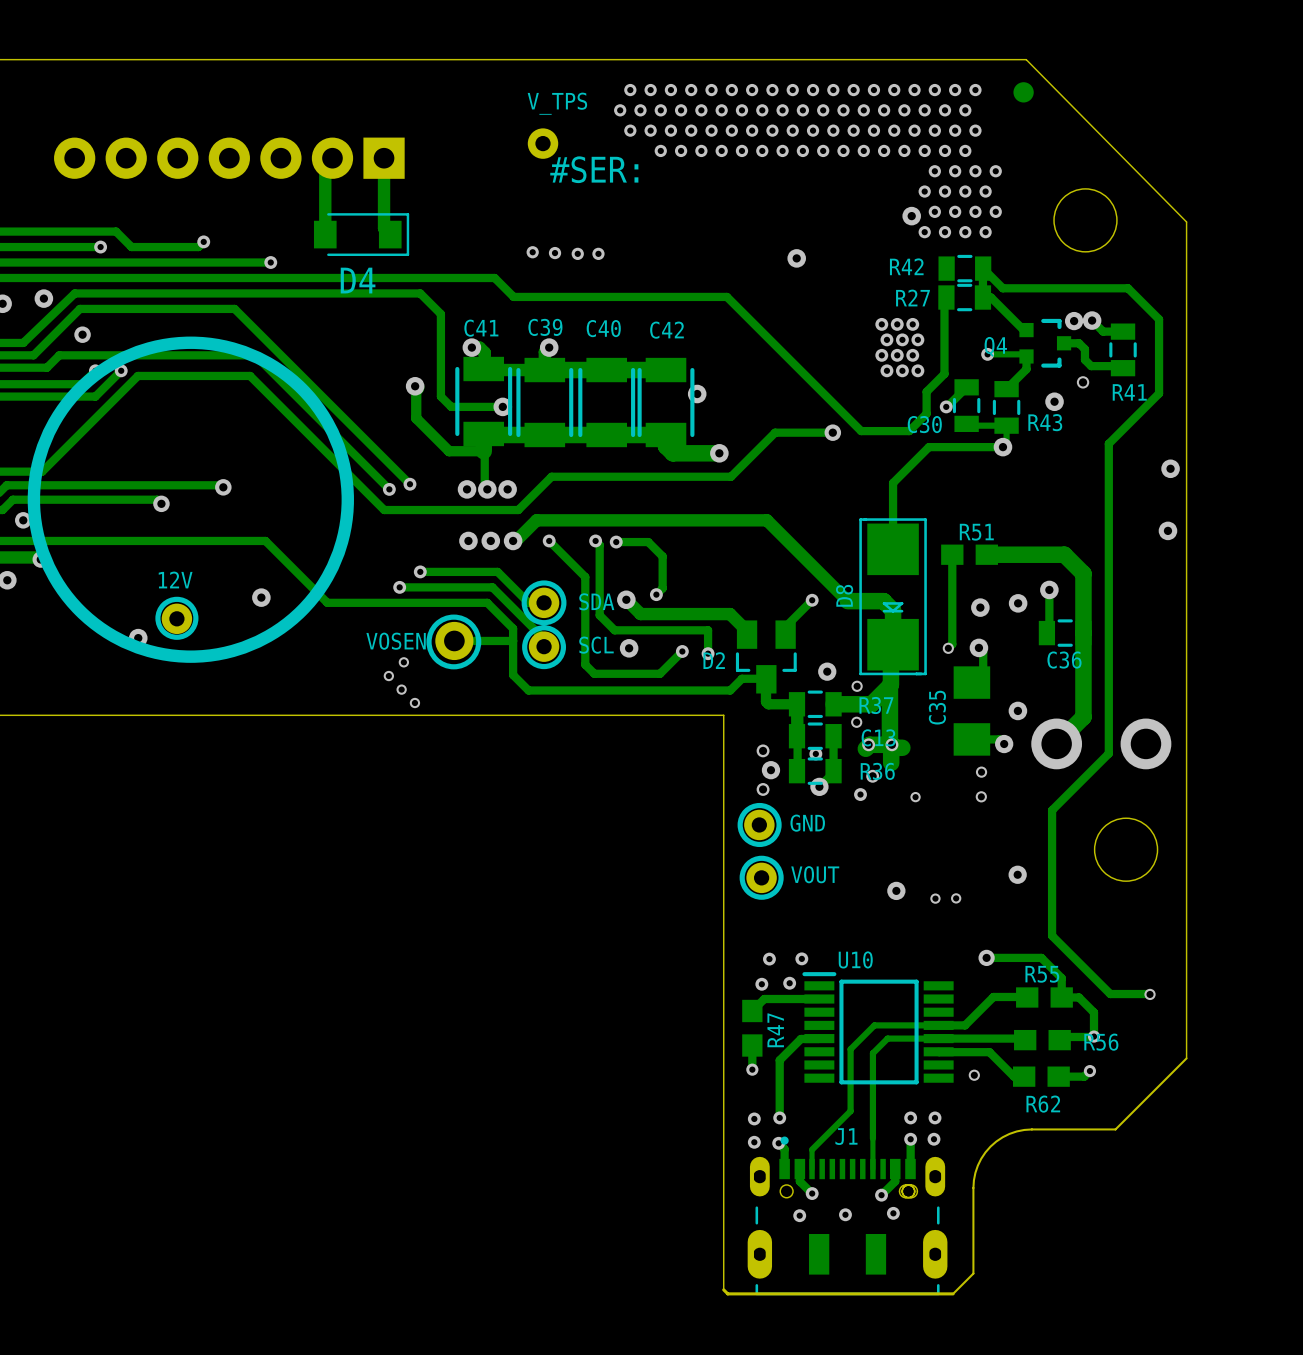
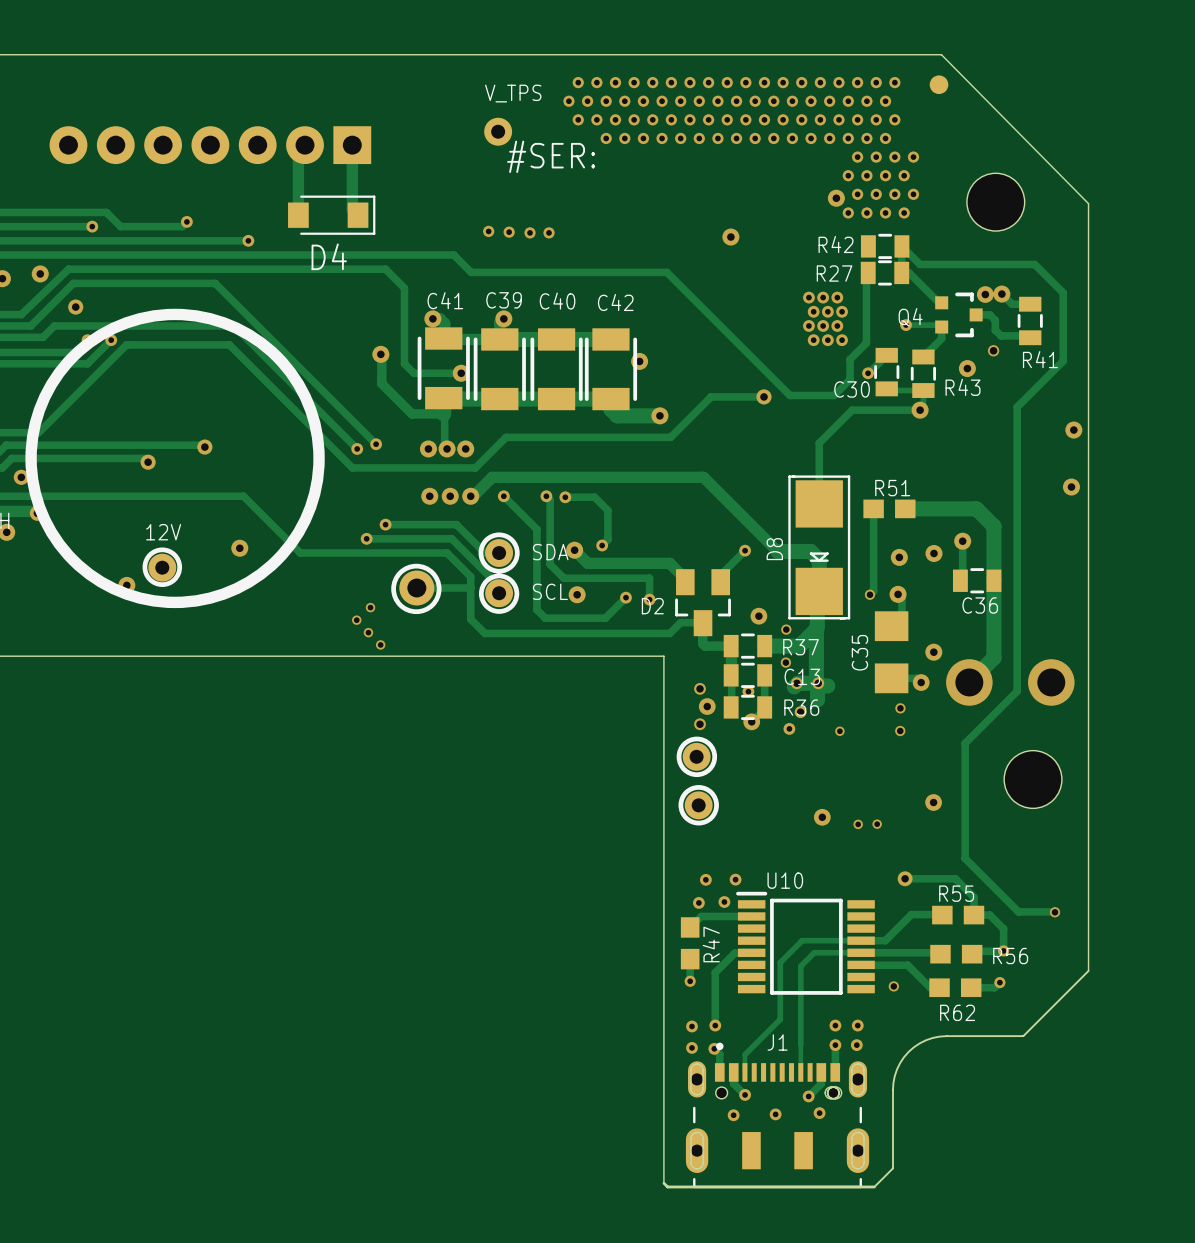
text: VOSEN (396, 641) -> none
text: GND (807, 823) -> none
text: VOUT (815, 874) -> none

